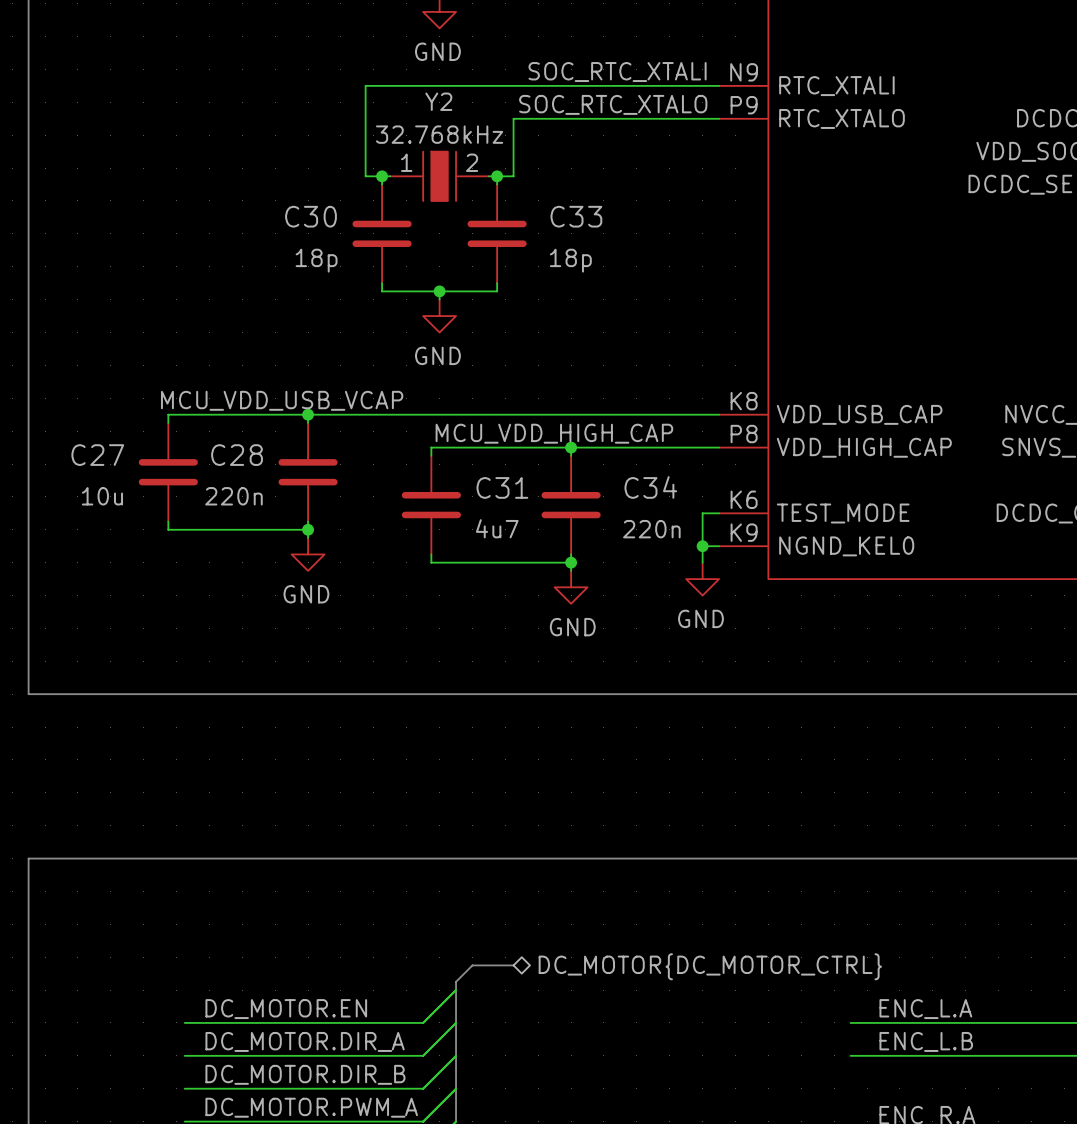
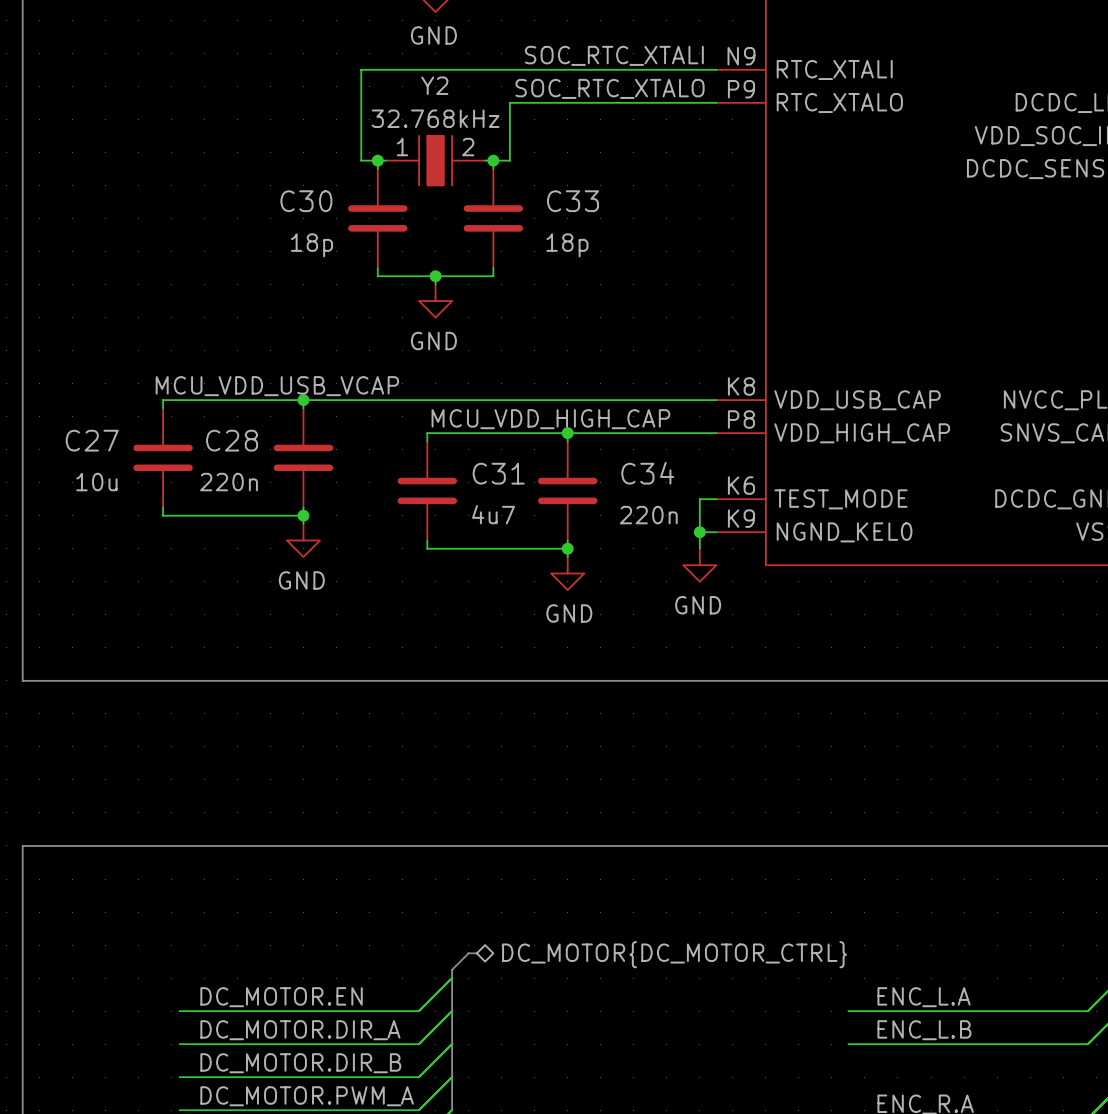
bus: (480, 965) (513, 965) -> none
hierarchical label position: DC_MOTOR{DC_MOTOR_CTRL} (710, 966) -> DC_MOTOR{DC_MOTOR_CTRL} (674, 954)

